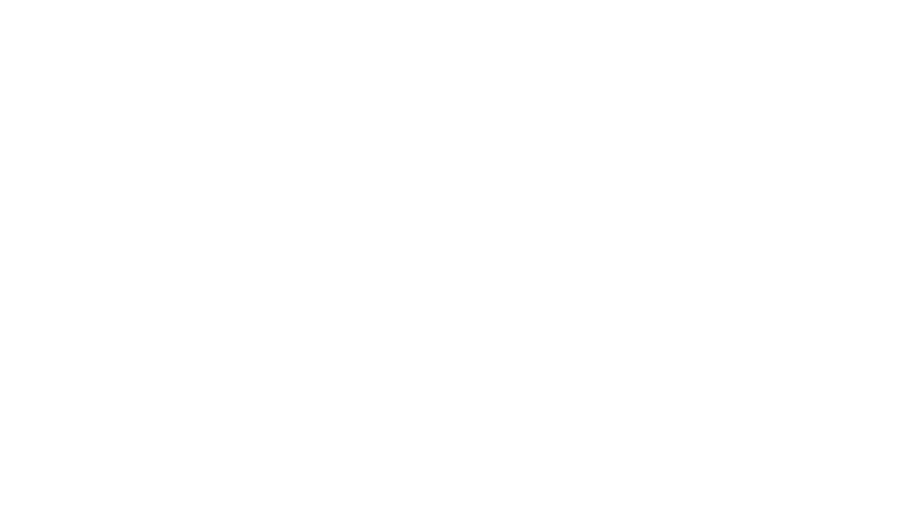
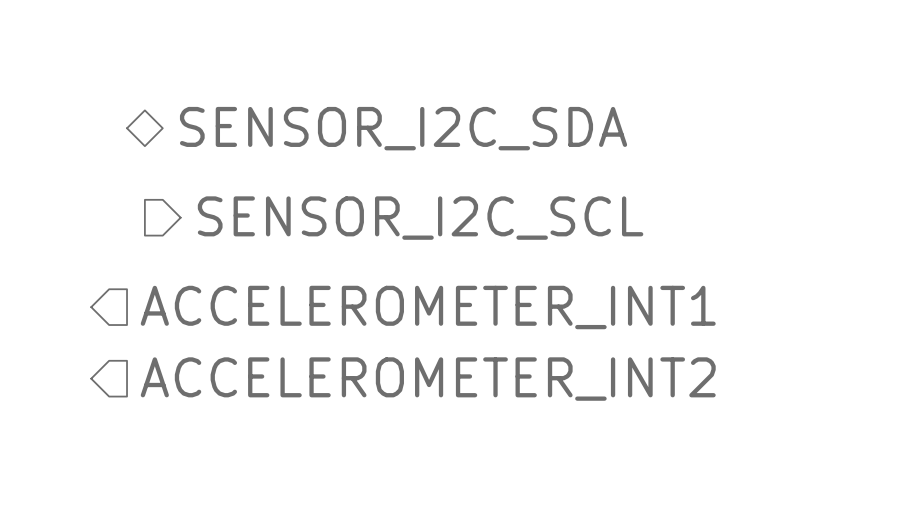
hierarchical label: none -> SENSOR_I2C_SDA (403, 128)
hierarchical label: none -> SENSOR_I2C_SCL (420, 218)
hierarchical label: none -> ACCELEROMETER_INT1 (428, 307)
hierarchical label: none -> ACCELEROMETER_INT2 (428, 379)

